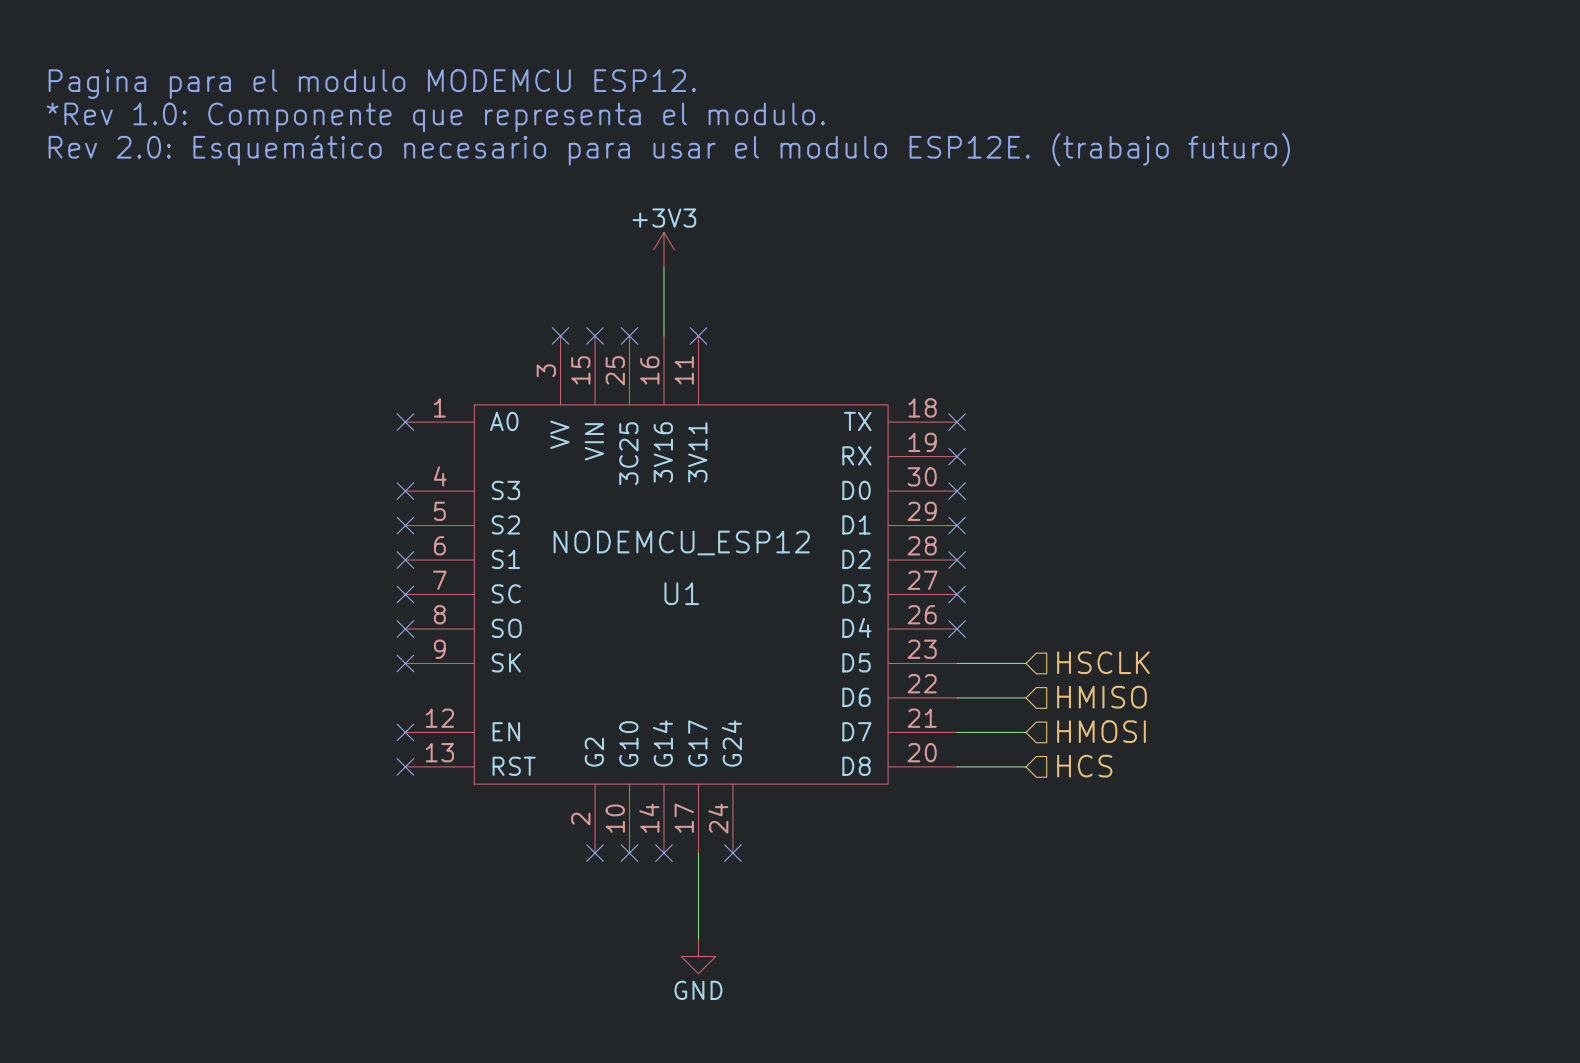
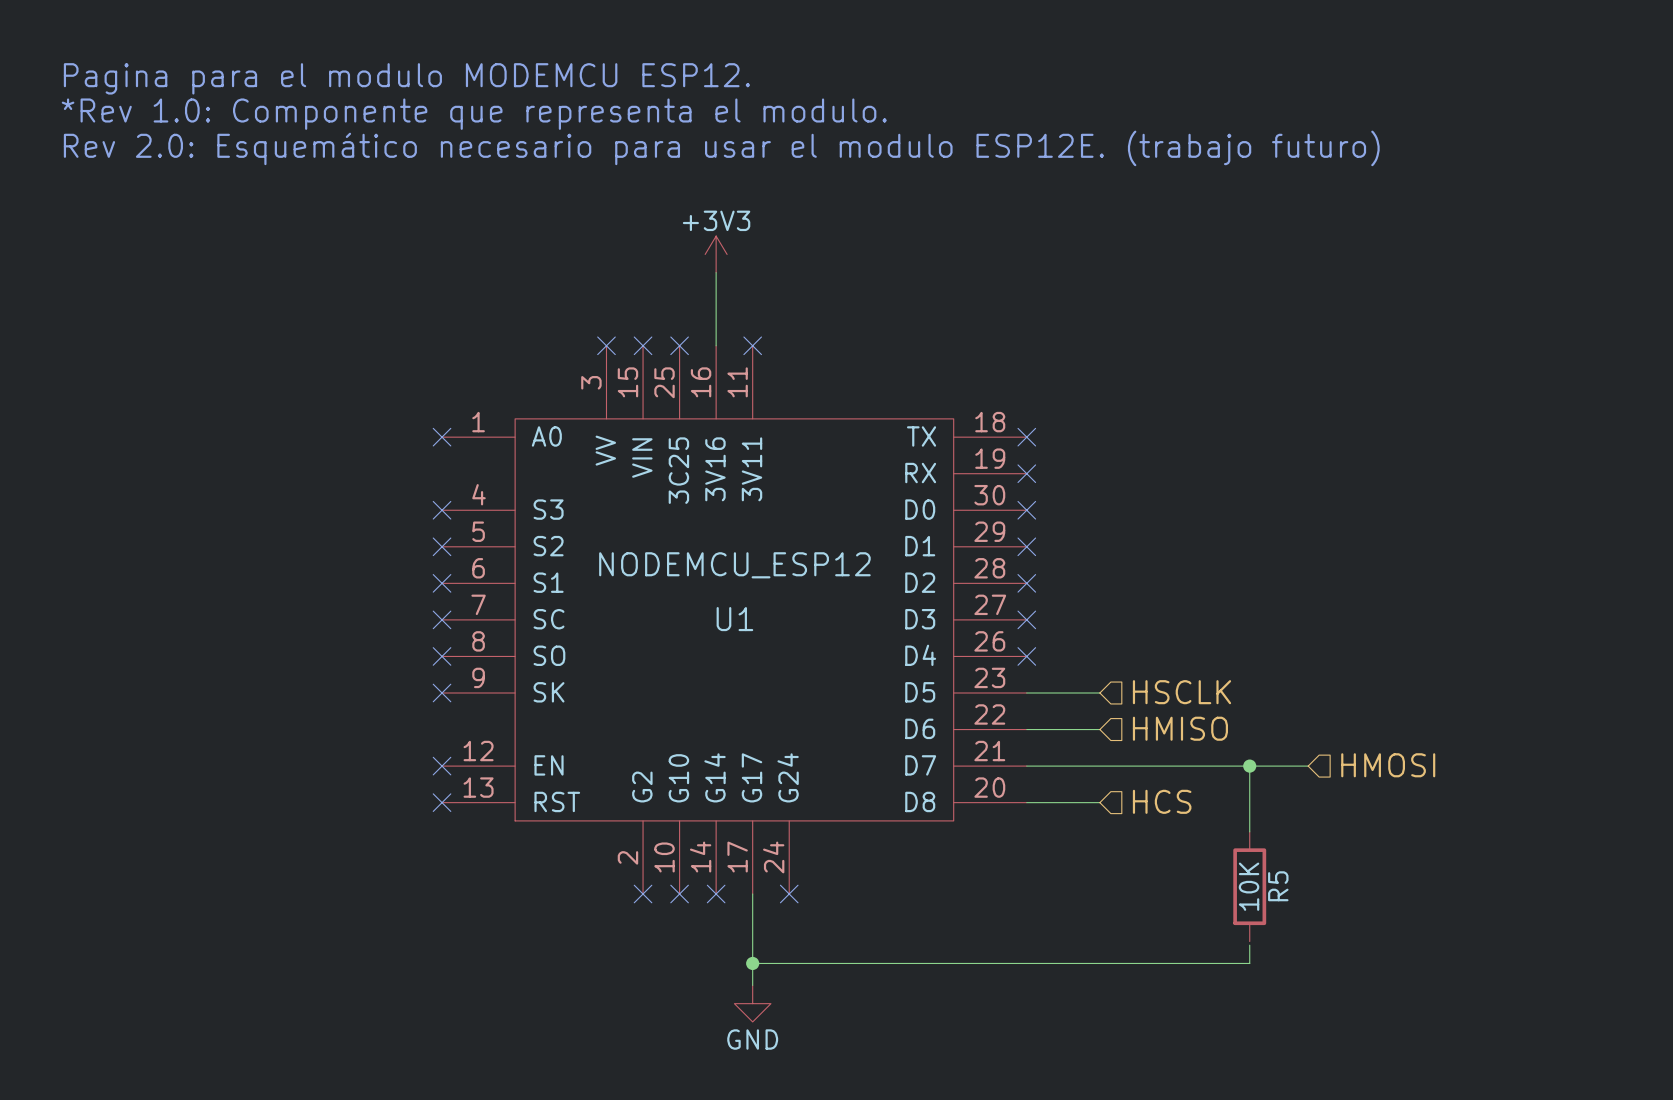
hierarchical label position: HMOSI (1101, 731) -> HMOSI (1388, 765)
wire: none -> (1099, 766) (1308, 766)
wire: none -> (1249, 766) (1249, 831)
junction: none -> (1249, 766)
R5: none -> 10K (1249, 886)
wire: none -> (1249, 945) (1249, 963) (752, 963)
junction: none -> (752, 963)

